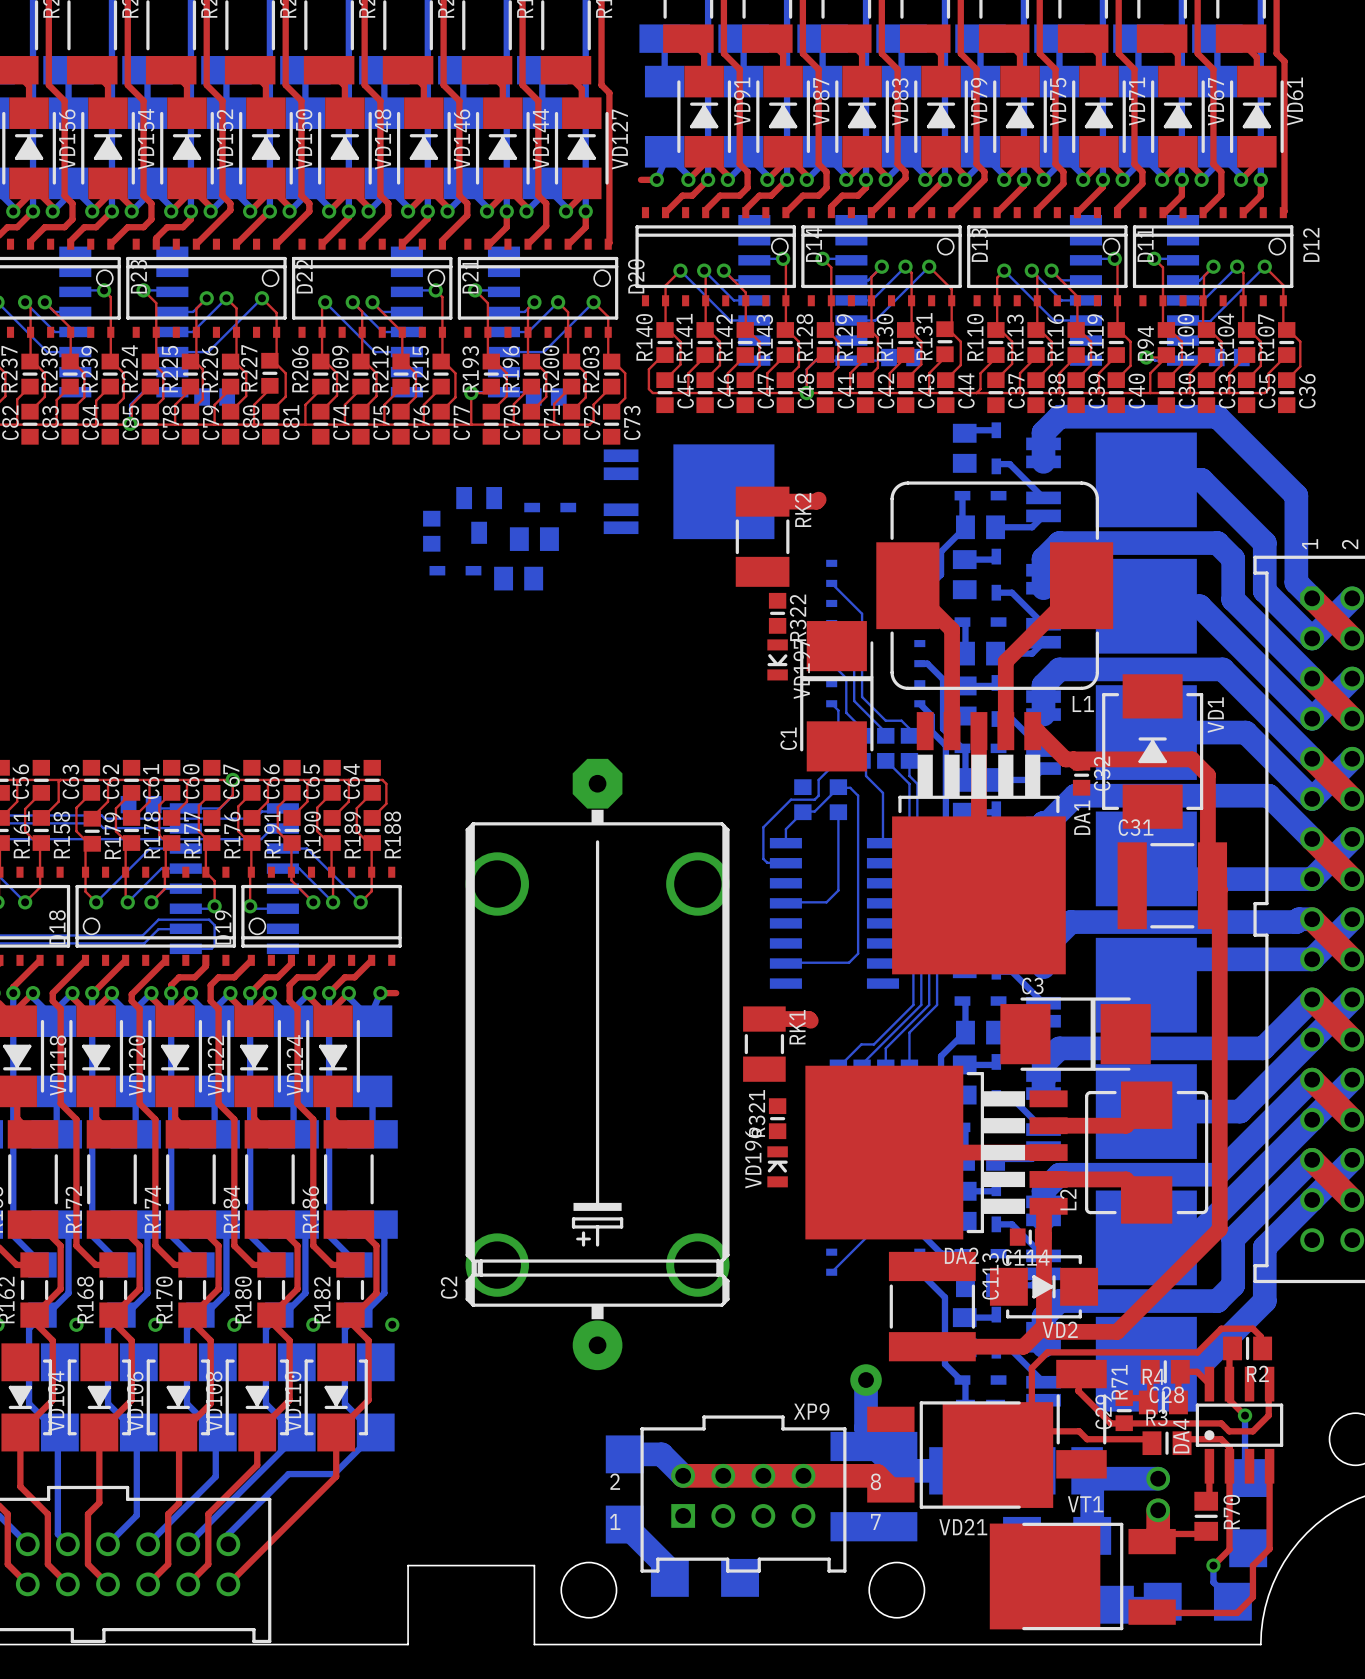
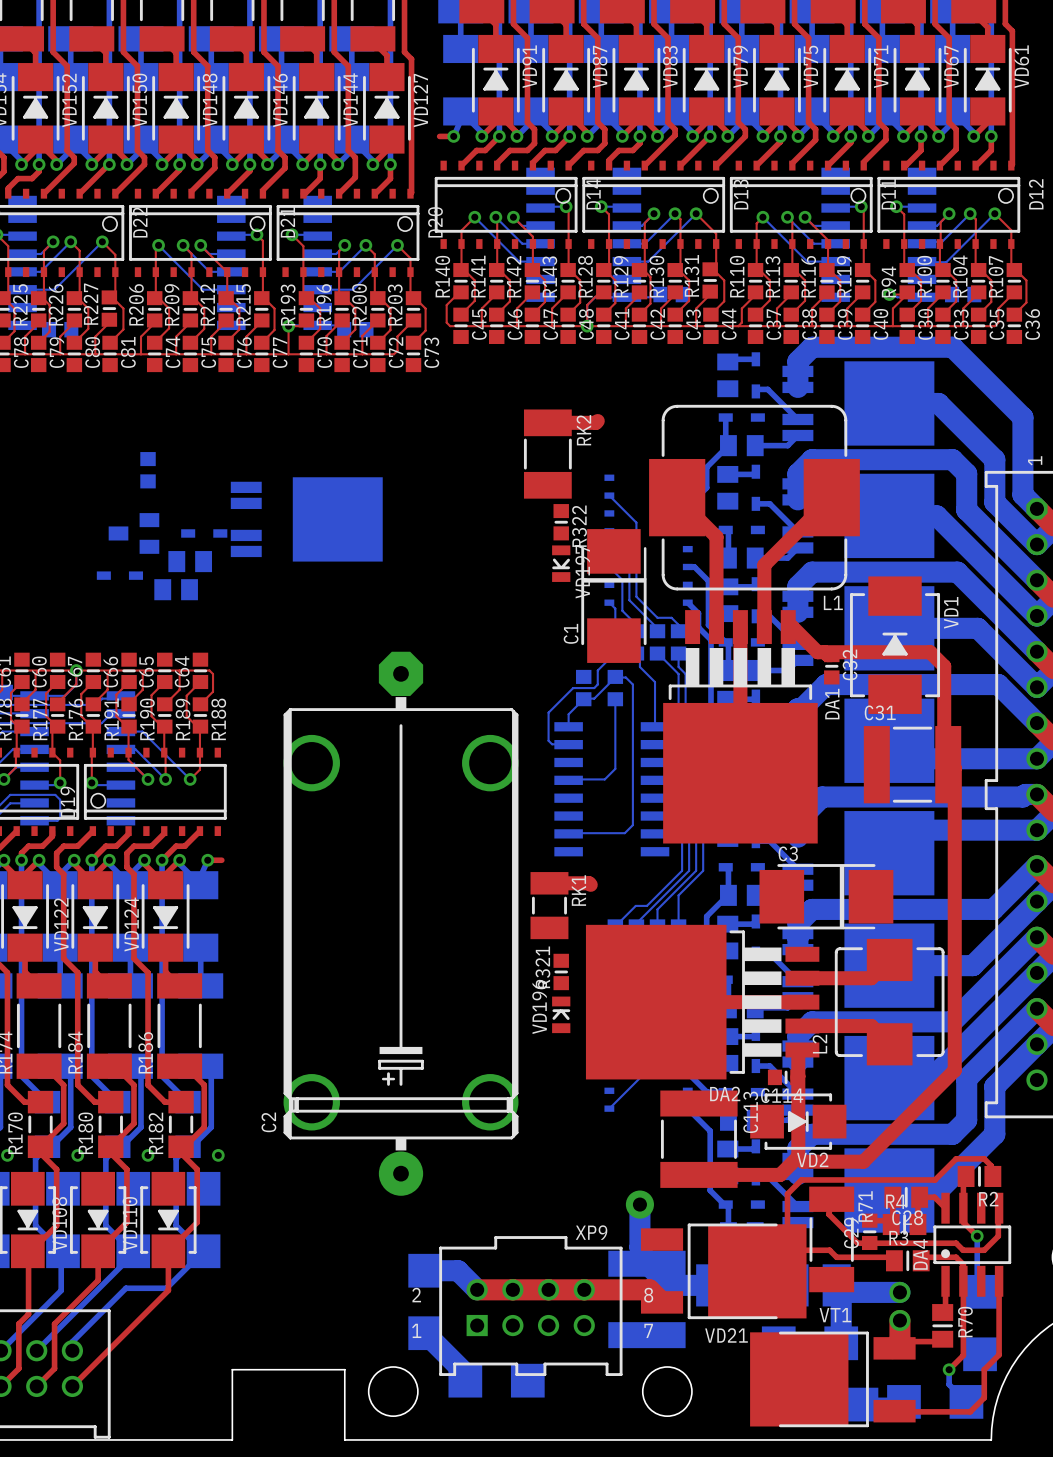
part position: (689, 491) -> (306, 519)
part: (550, 507) -> none
part rotation: 0° (479, 515) -> 90° clockwise (133, 533)
part position: (479, 515) -> (133, 533)
part position: (431, 531) -> (148, 470)
part: (534, 539) -> none
part position: (455, 570) -> (204, 533)
part: (518, 578) -> none
part: none -> (190, 561)
part: none -> (119, 575)
part: none -> (176, 589)

